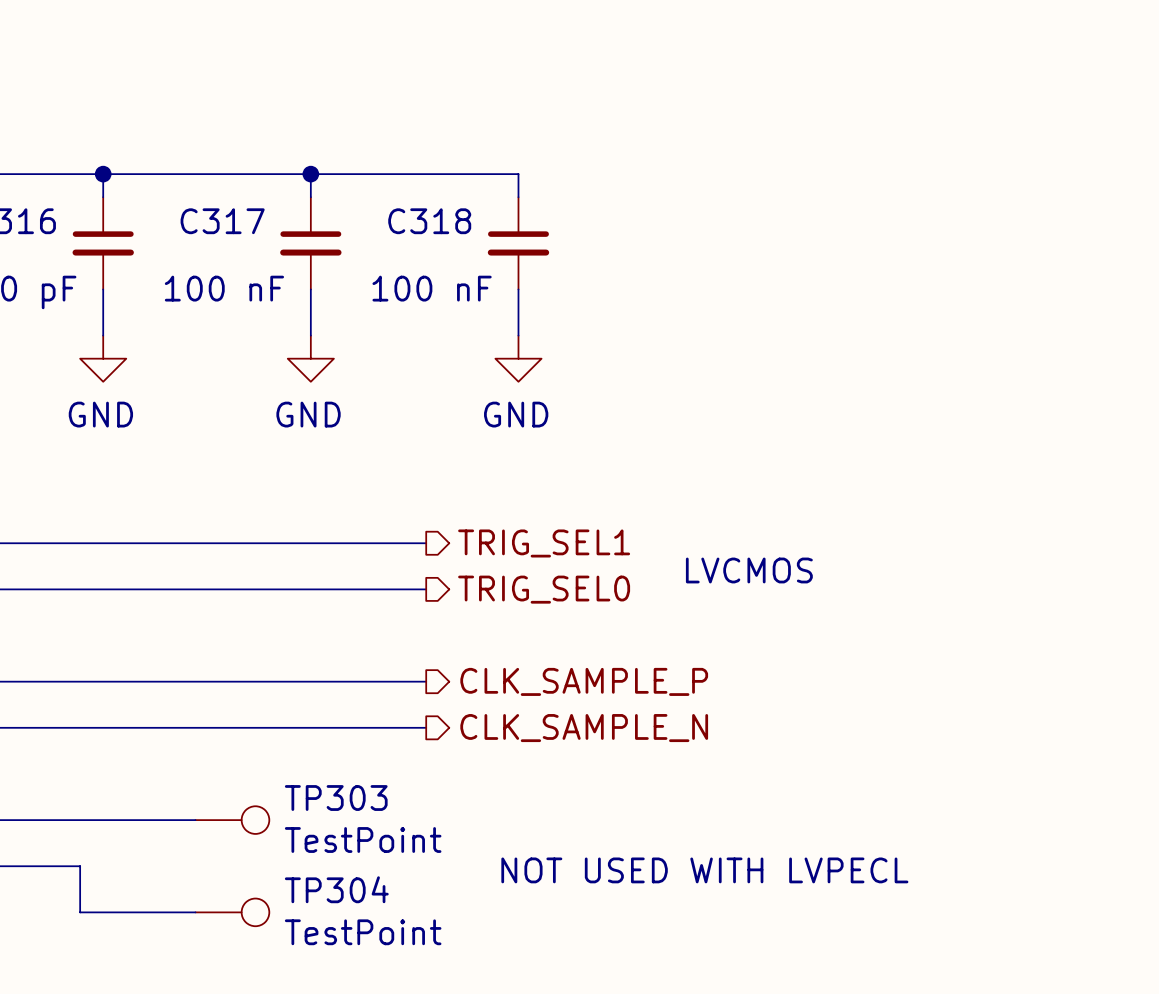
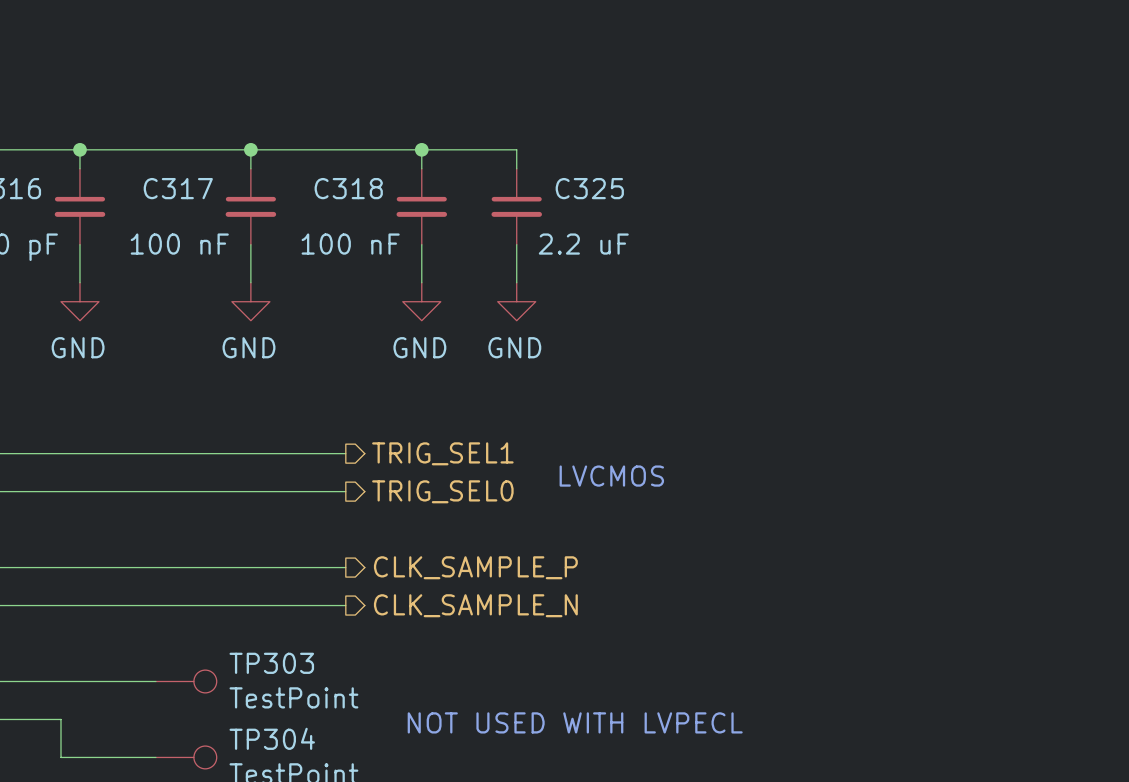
wire: none -> (421, 149) (516, 149) (516, 168)
junction: none -> (421, 149)
C325: none -> 2.2 uF (516, 206)
wire: none -> (516, 244) (516, 282)
power symbol: none -> GND (516, 301)

